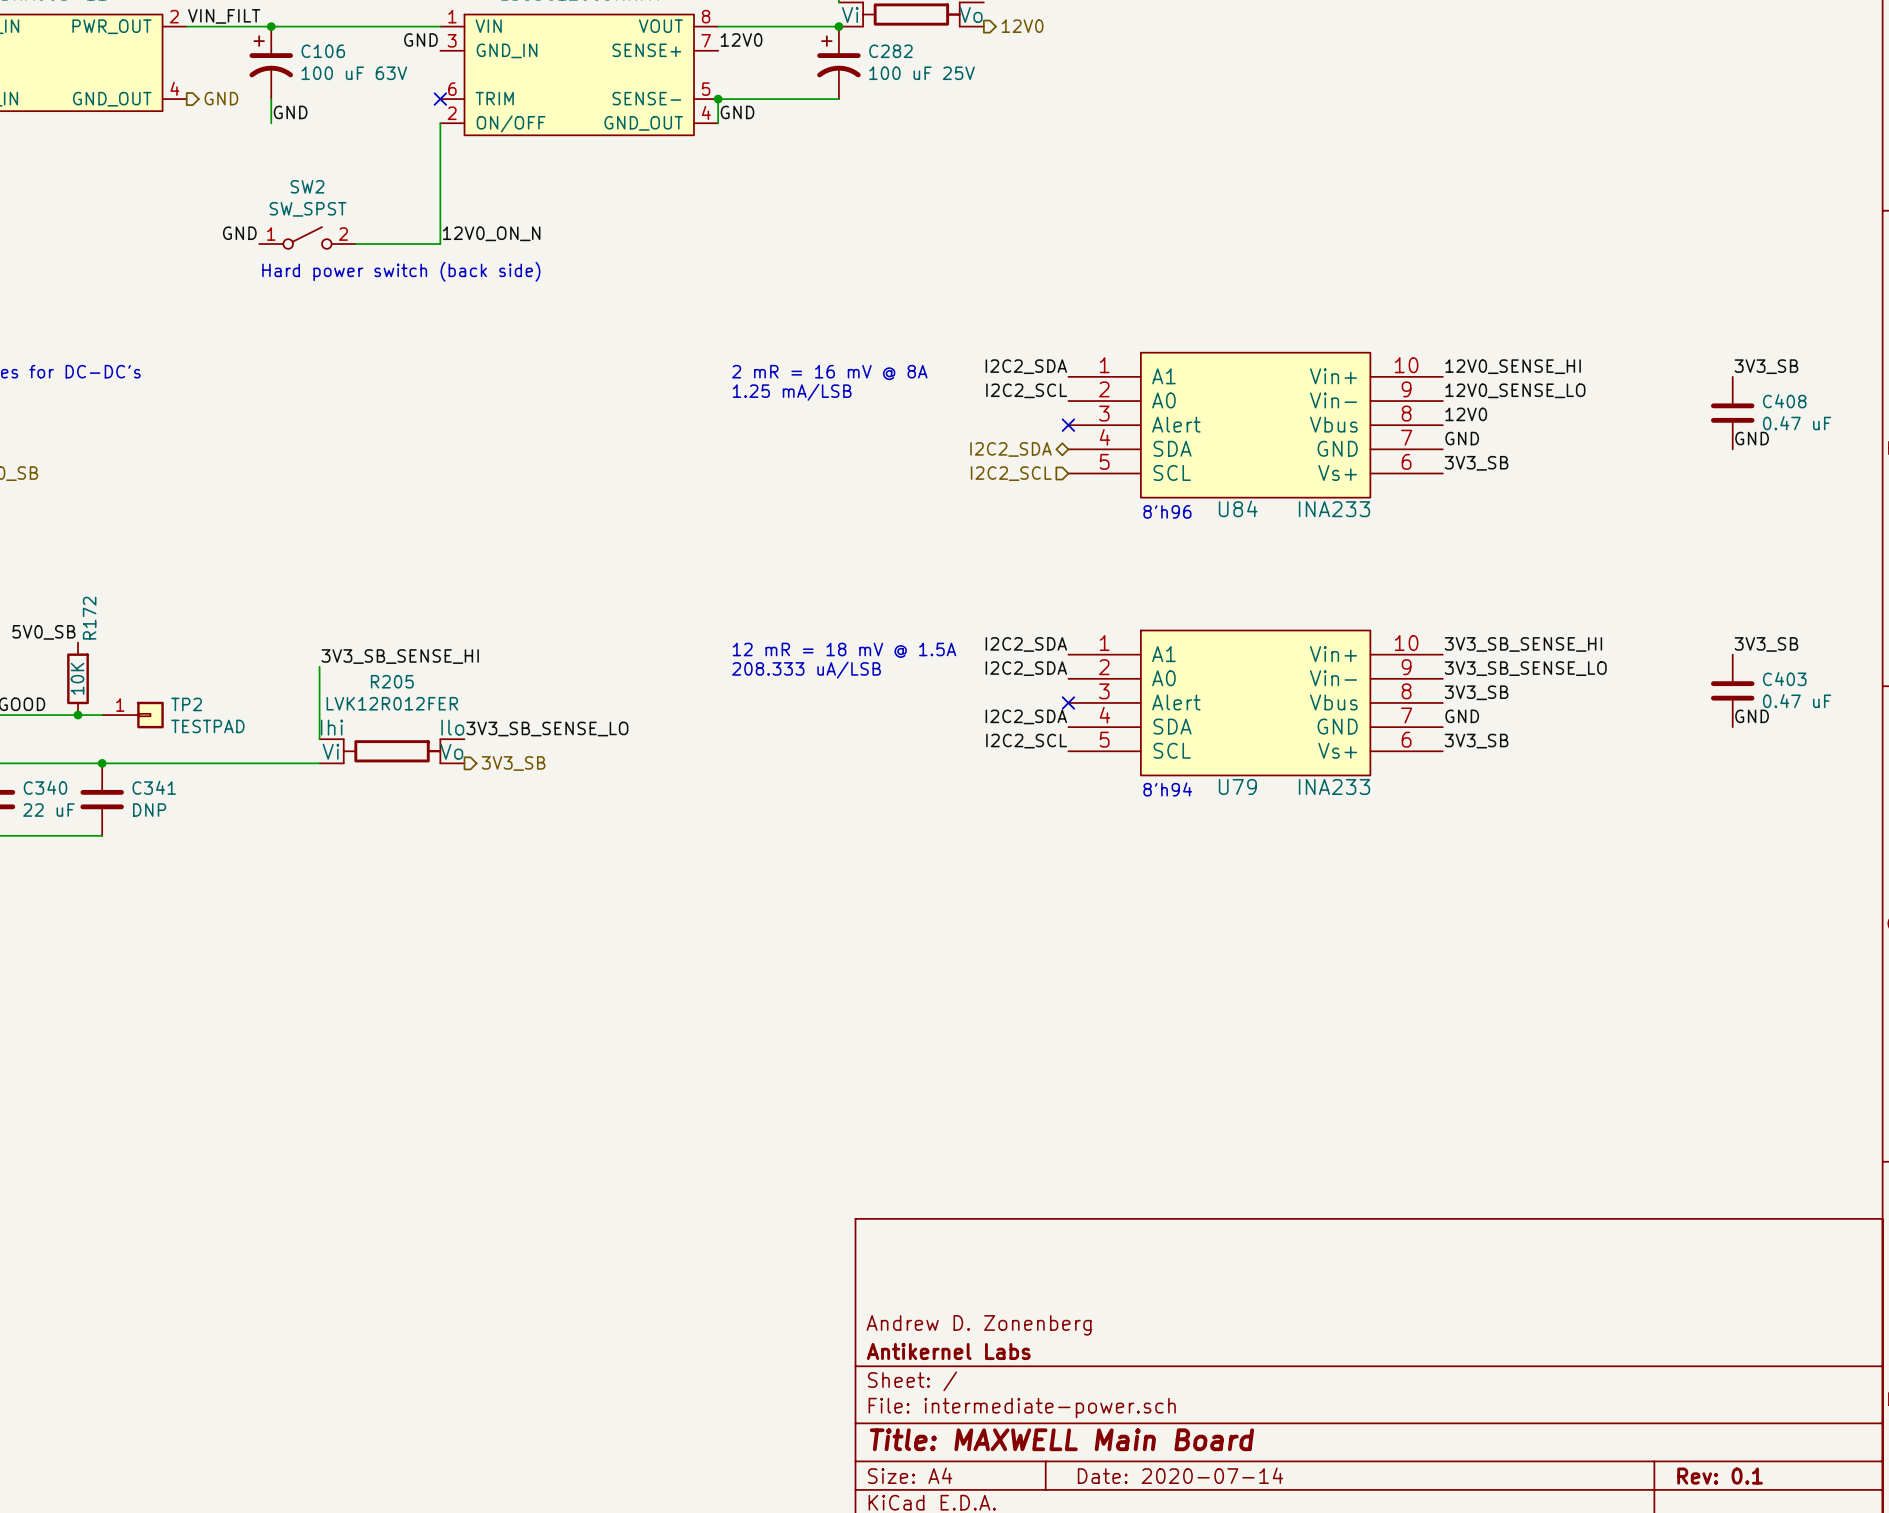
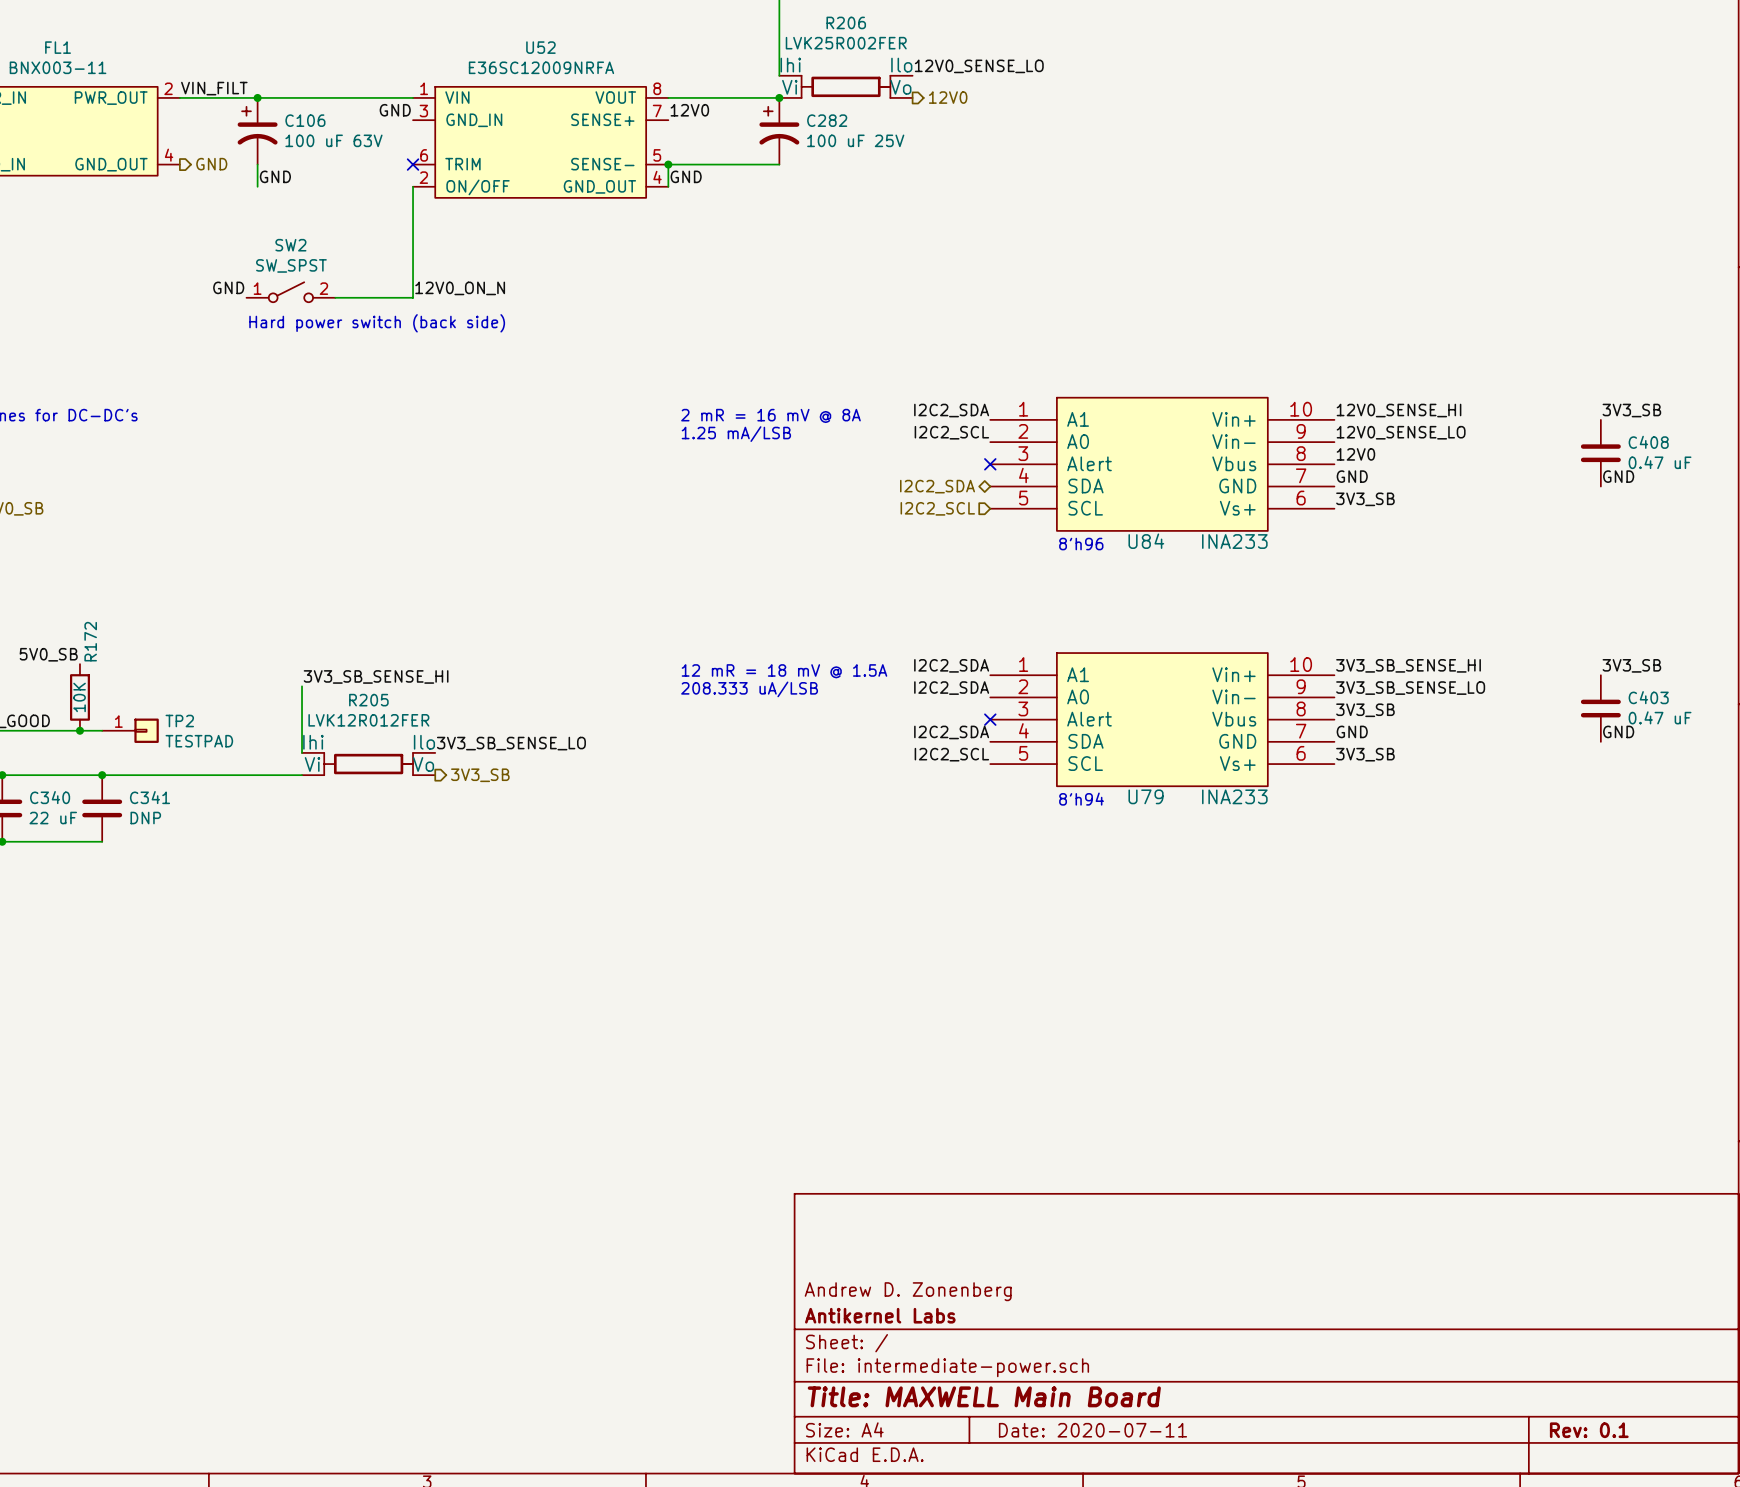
title block: Date: 2020-07-14 (1180, 1475) -> Date: 2020-07-11 (1092, 1430)

